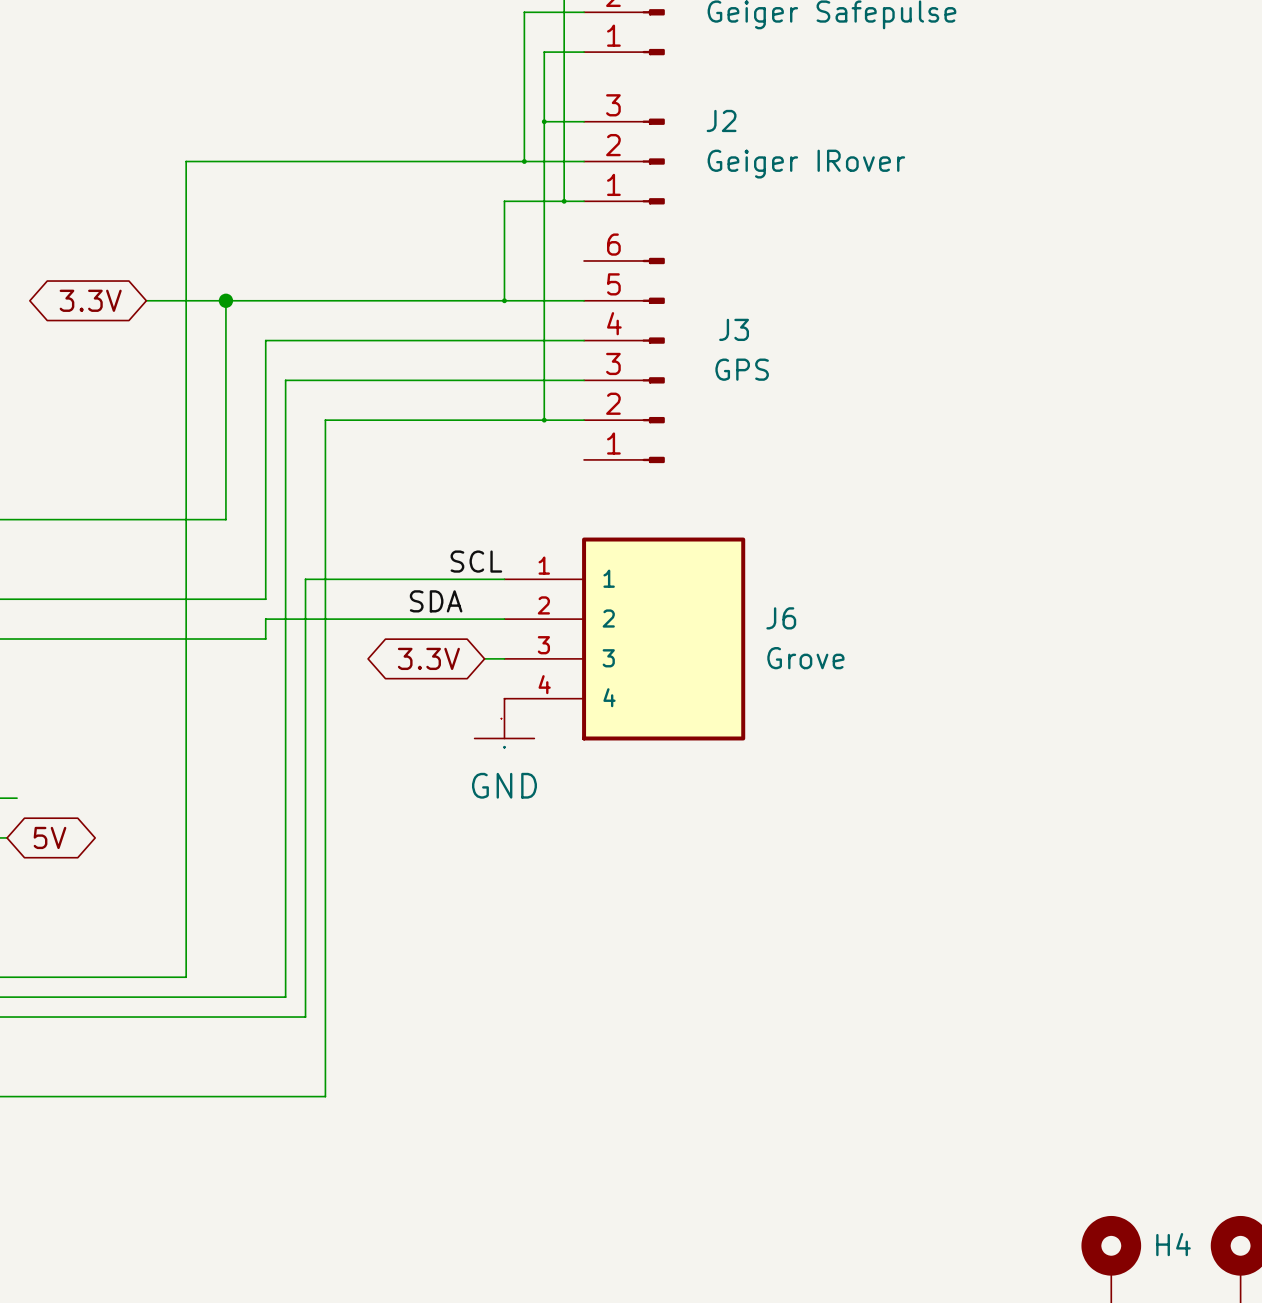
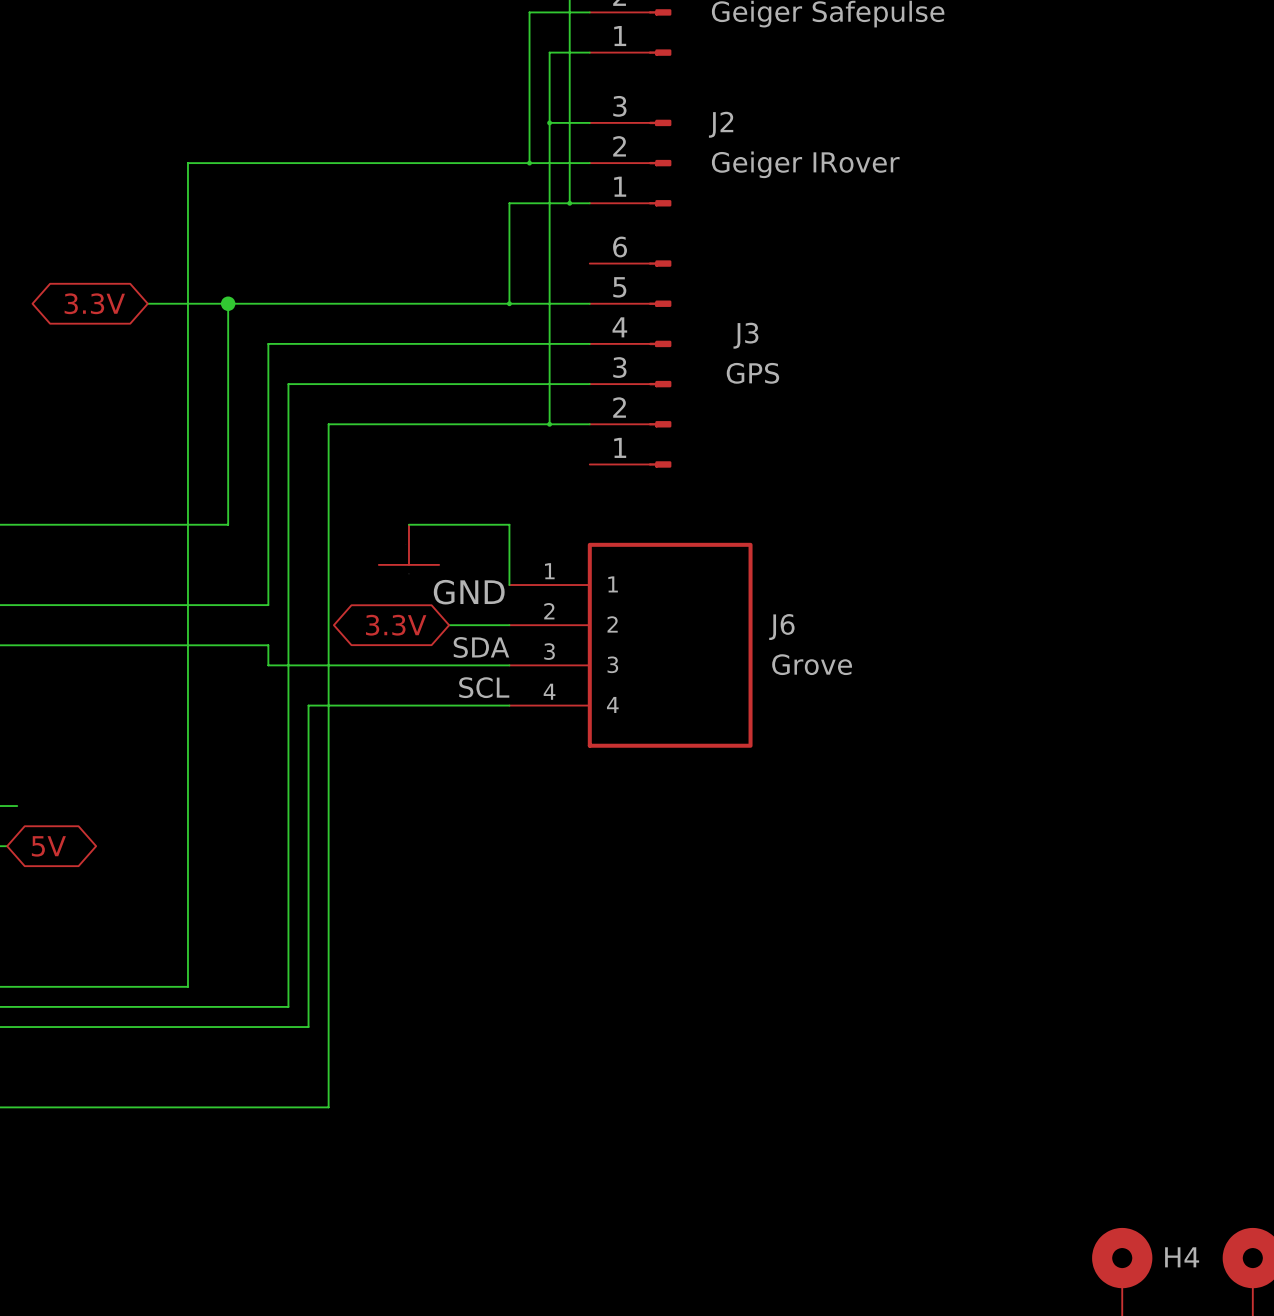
wire: none -> (408, 524) (509, 524) (509, 585)
label position: SCL (476, 561) -> SCL (484, 687)
wire: (504, 579) (305, 579) (305, 698) -> (509, 705) (308, 705)
label position: SDA (436, 601) -> SDA (481, 647)
wire: (444, 619) (265, 619) (265, 639) -> (489, 665) (268, 665) (268, 645)
global label position: 3.3V (428, 658) -> 3.3V (396, 625)
power symbol position: GND (504, 718) -> GND (408, 544)
power symbol text position: GND (504, 785) -> GND (469, 592)

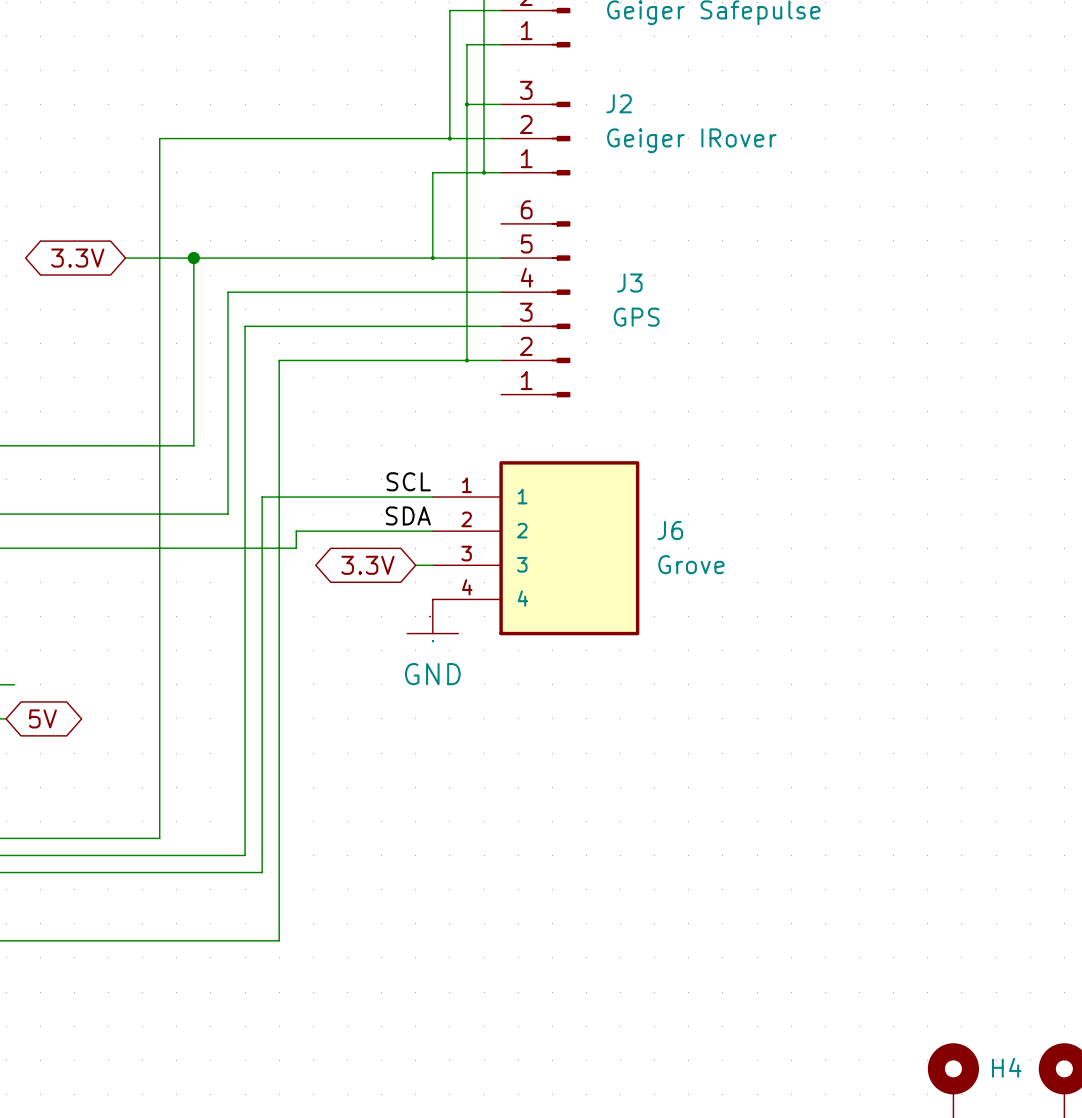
wire: (408, 524) (509, 524) (509, 585) -> none
power symbol position: GND (408, 544) -> GND (432, 616)
power symbol text position: GND (469, 592) -> GND (432, 674)
global label position: 3.3V (396, 625) -> 3.3V (367, 565)
wire: (268, 645) (268, 665) (489, 665) -> (227, 548) (296, 548) (296, 531) (381, 531)
label position: SDA (481, 647) -> SDA (408, 515)
label position: SCL (484, 687) -> SCL (408, 481)
wire: (308, 705) (509, 705) -> (262, 599) (262, 497) (432, 497)

